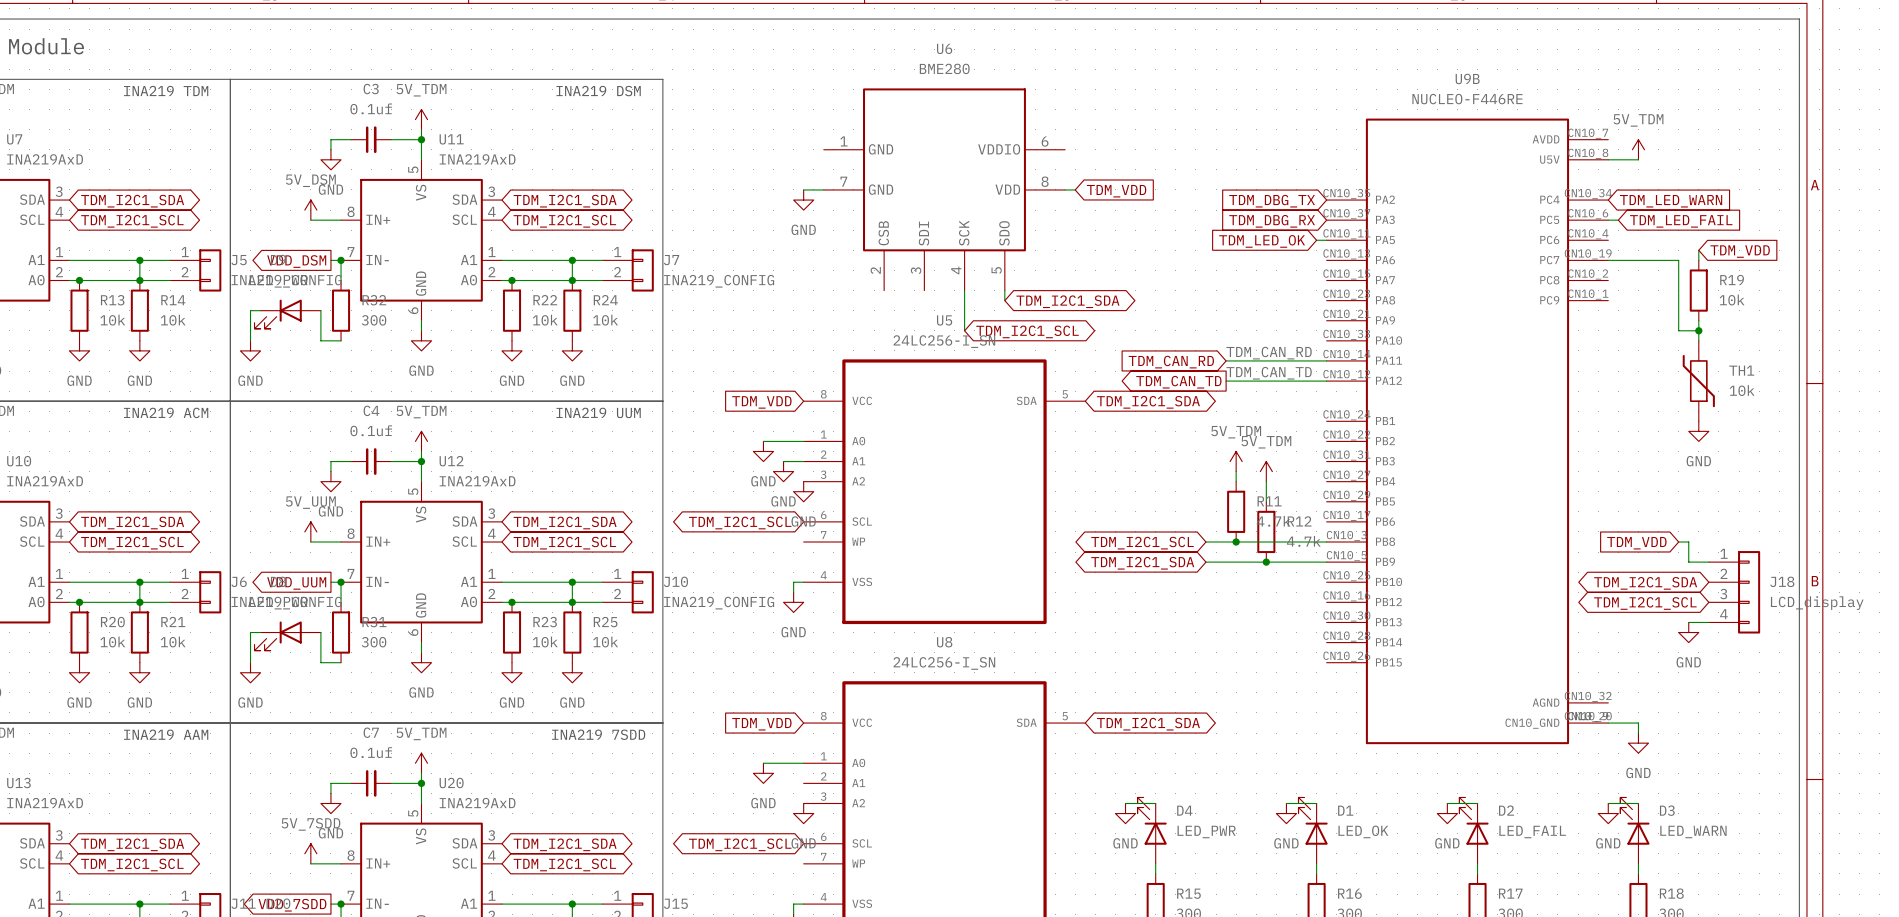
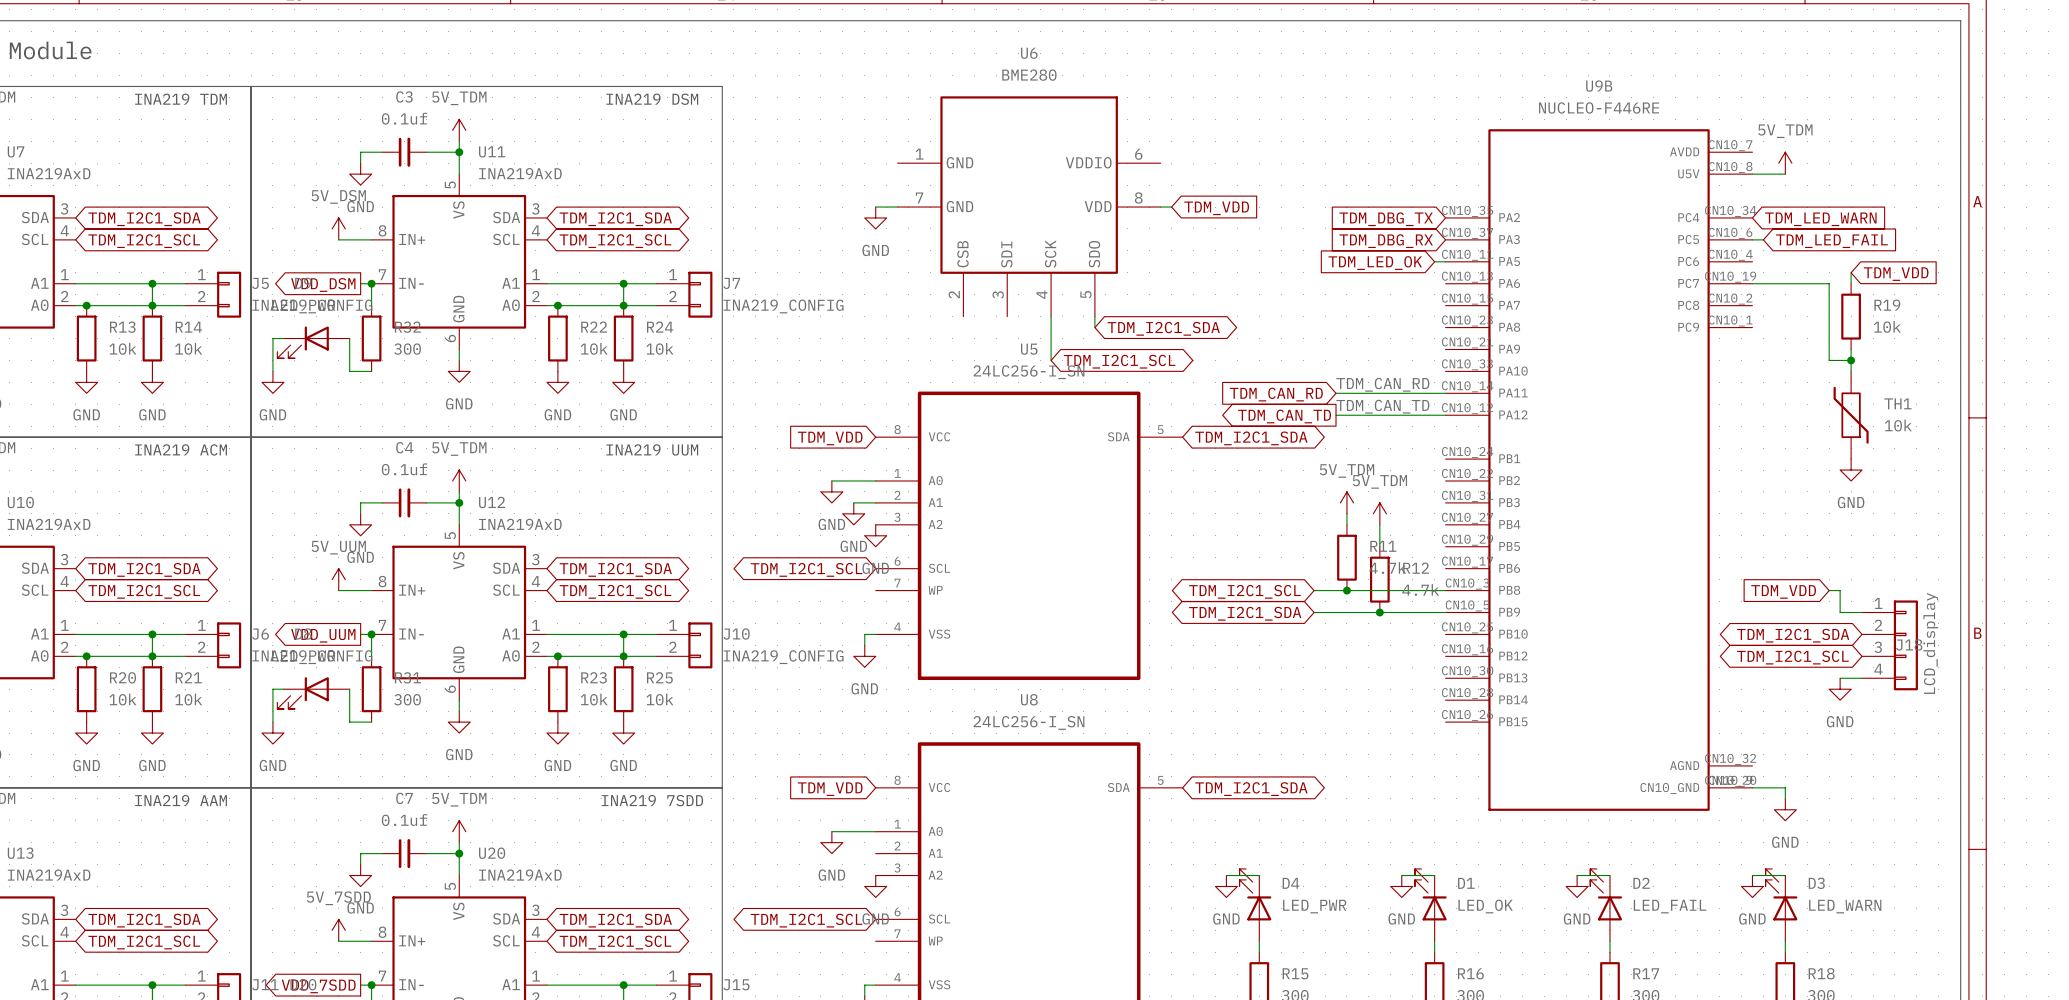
J18 name position: J18 (1782, 581) -> J18 (1909, 644)
J18 value rotation: 0° (1817, 603) -> 90° counterclockwise (1930, 643)

